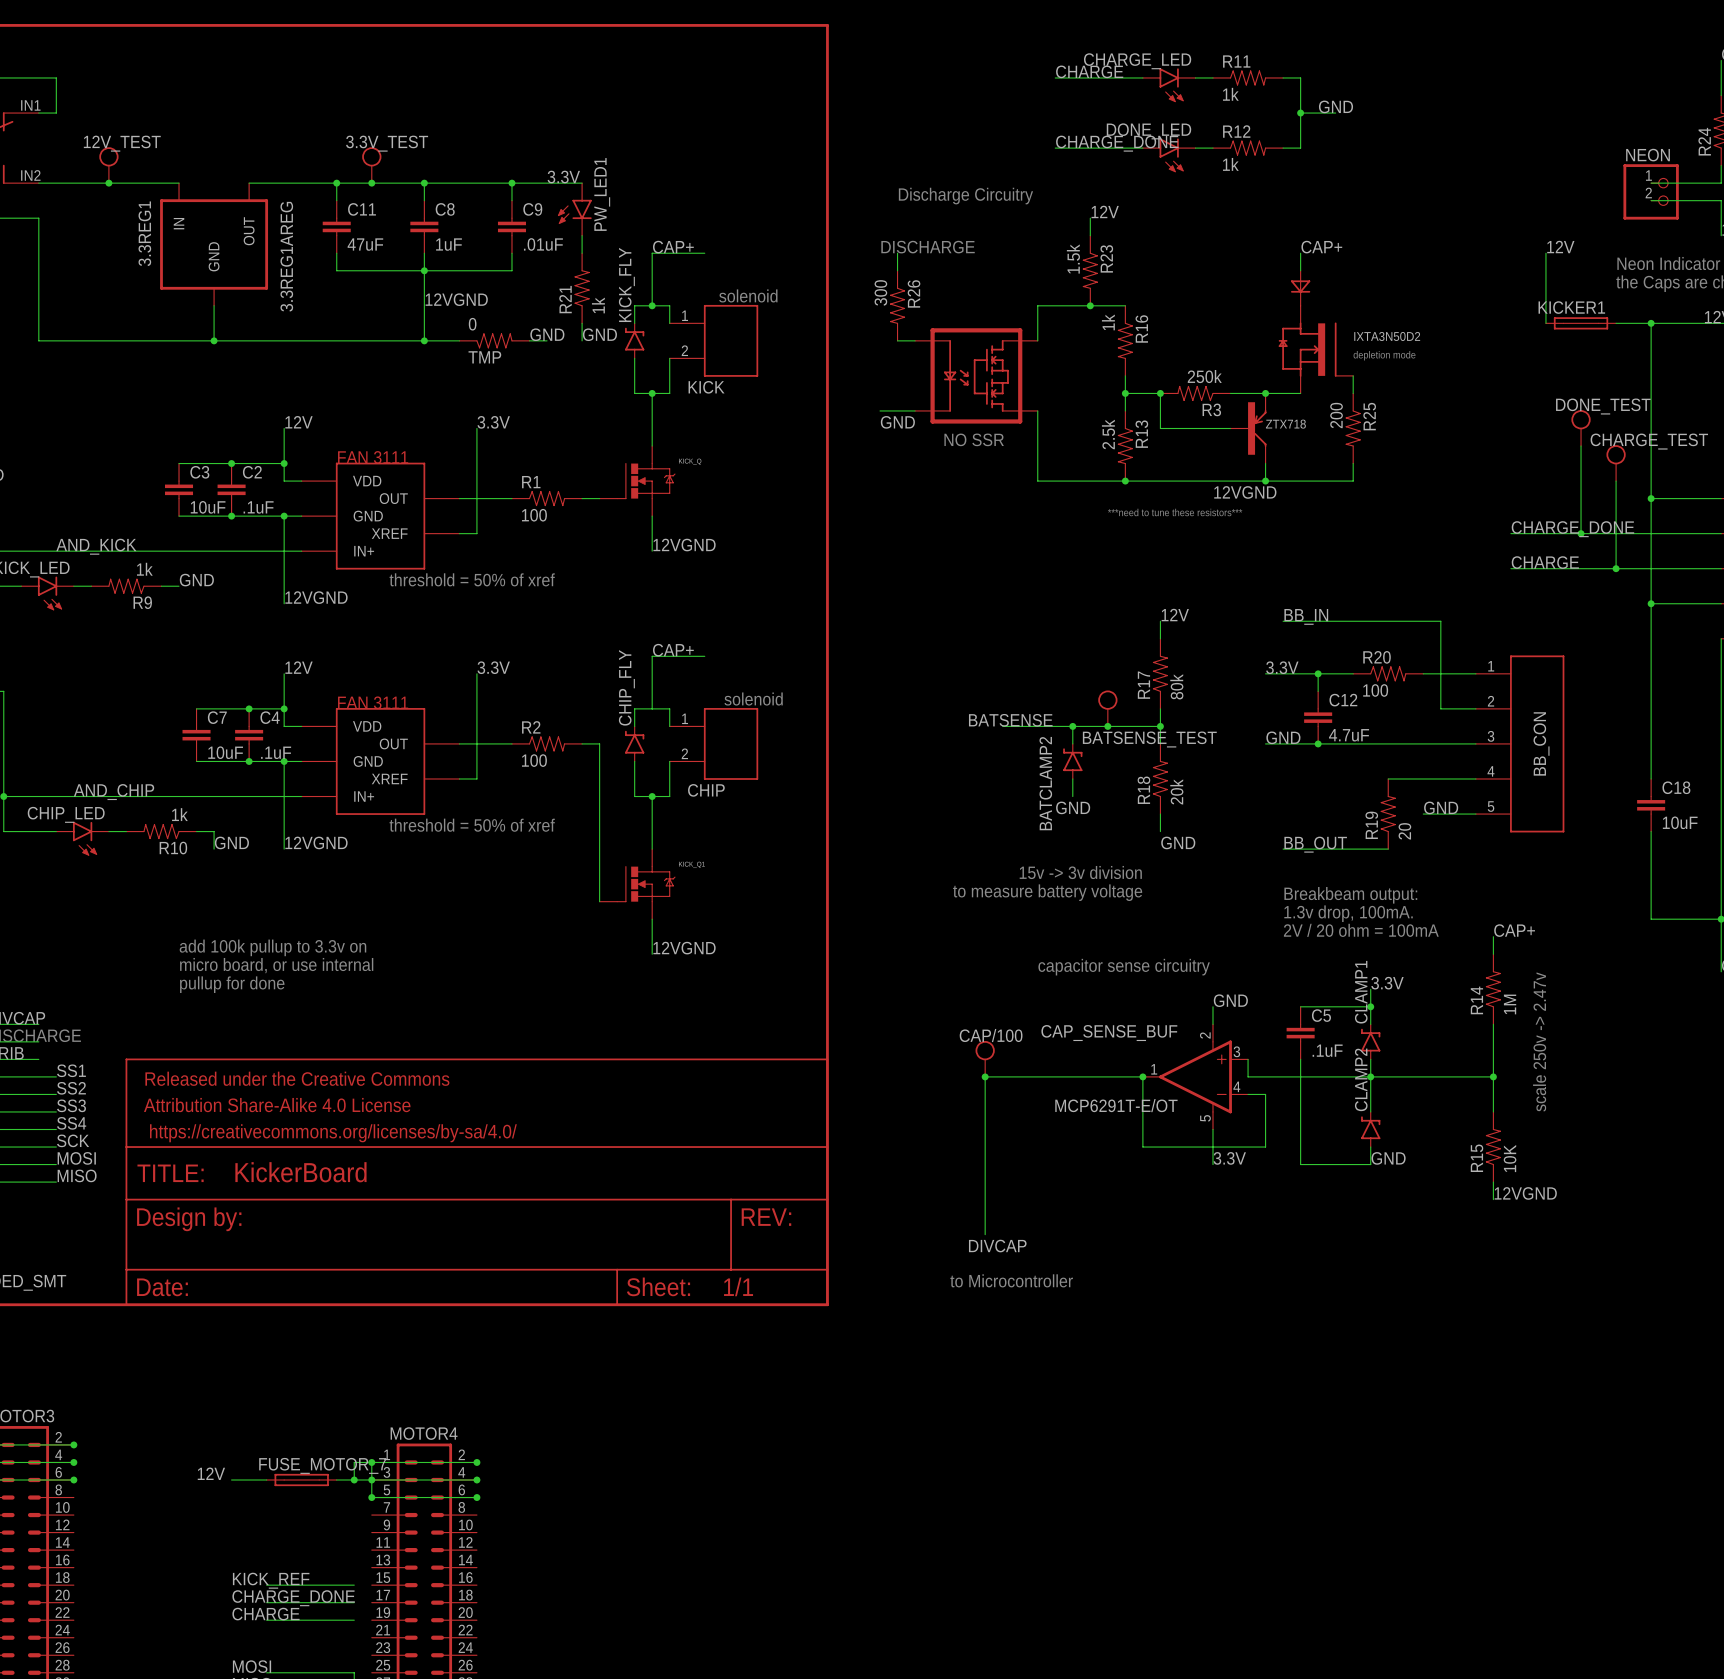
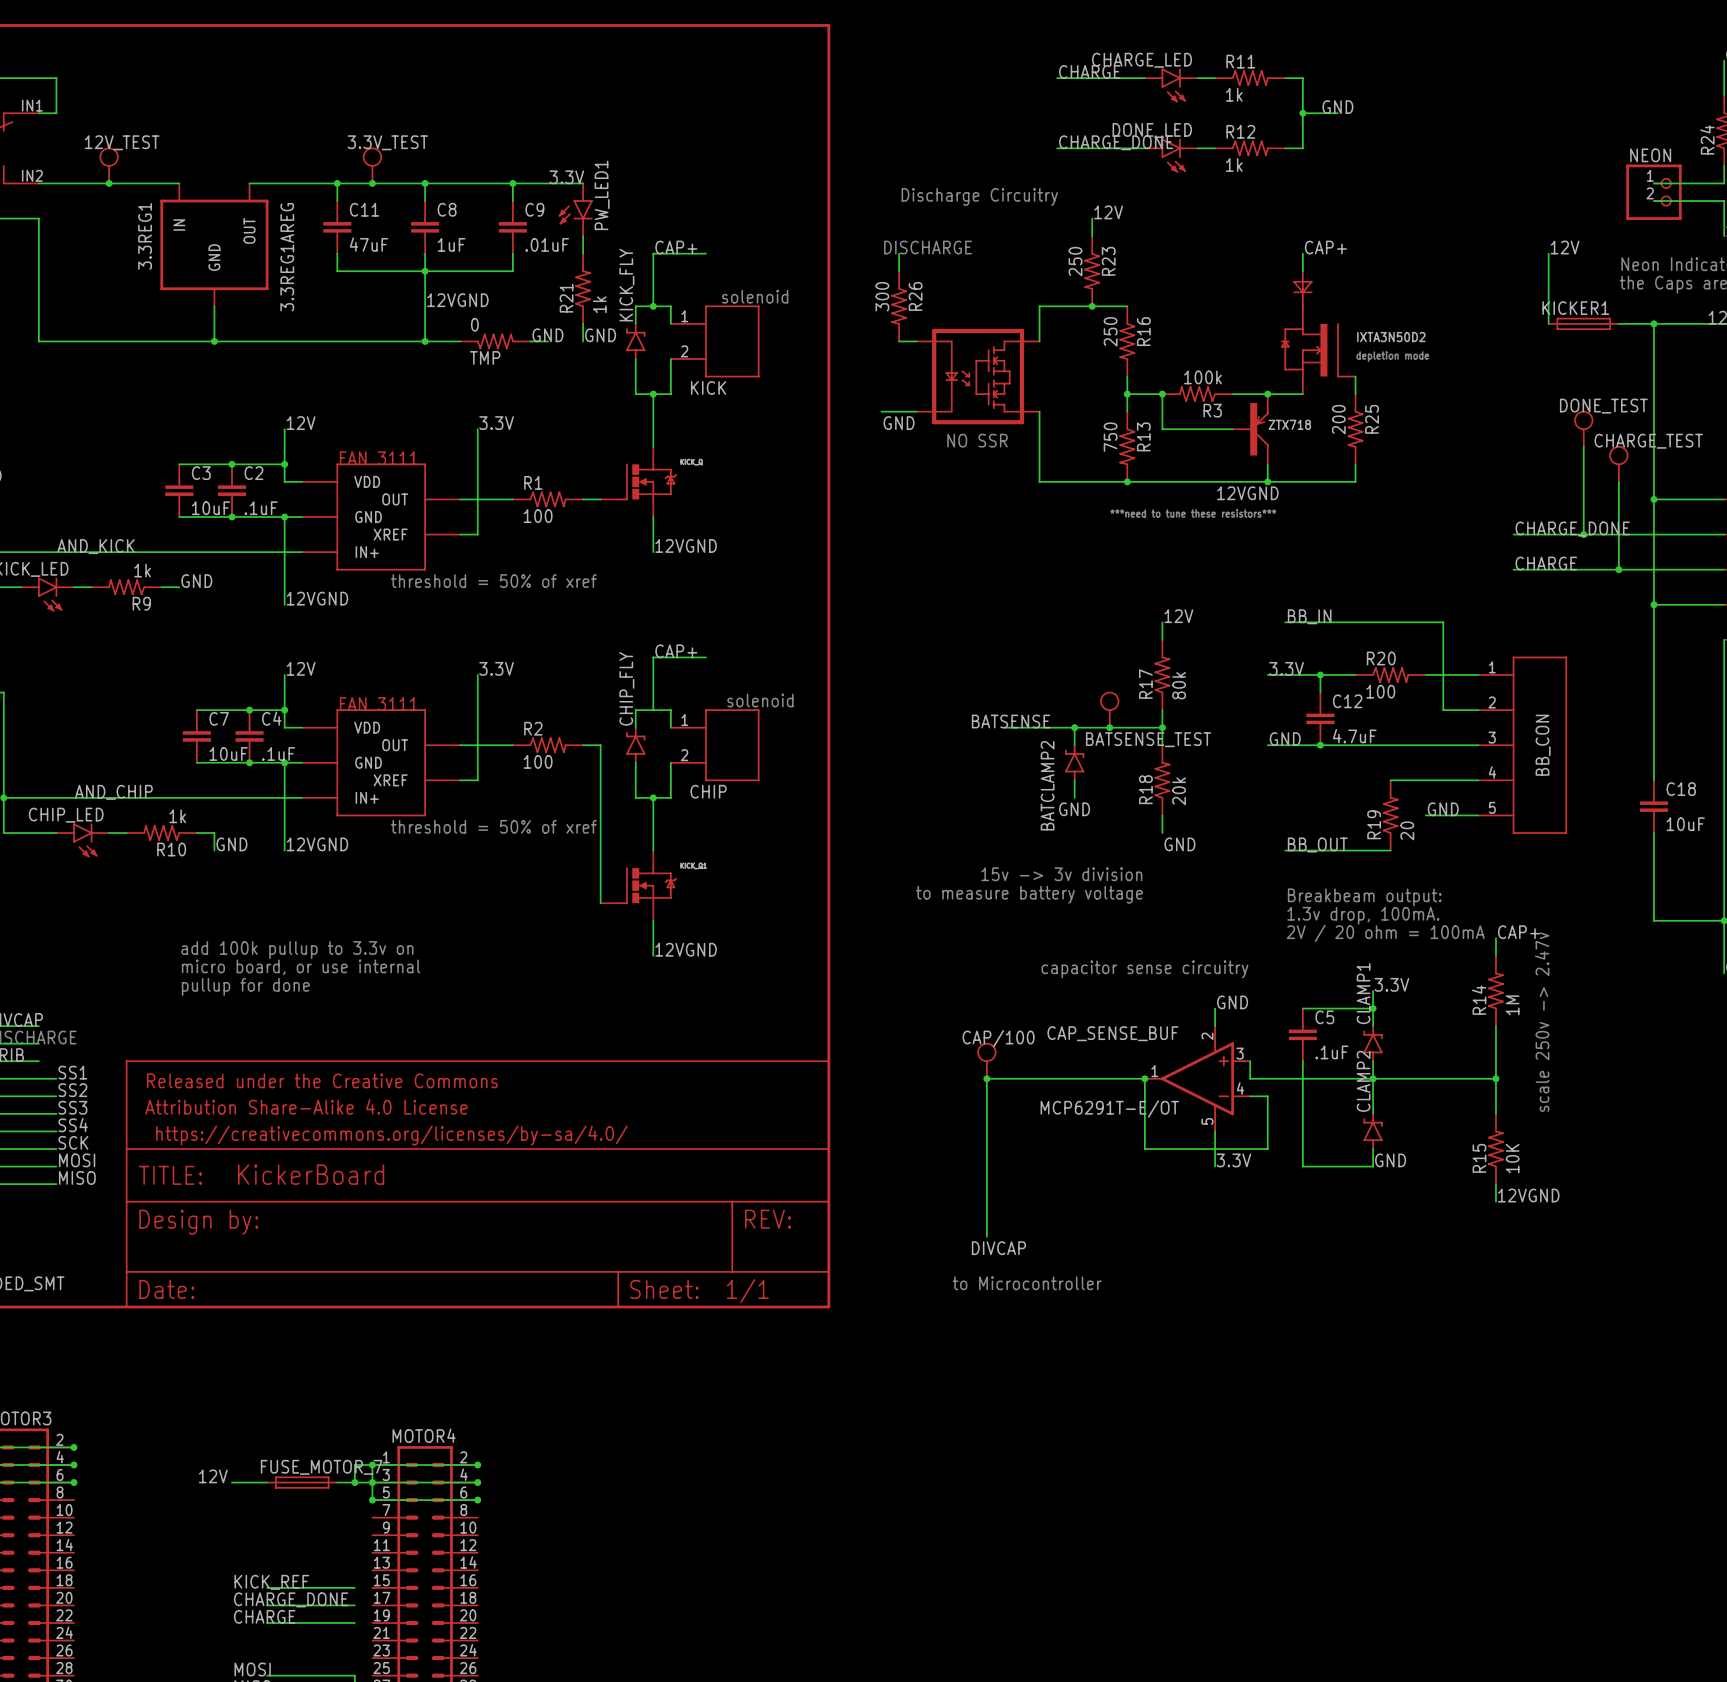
R23 value: 1.5k (1073, 259) -> 250 (1075, 261)
R16 value: 1k (1108, 322) -> 250 (1110, 331)
R3 value: 250k (1204, 376) -> 100k (1202, 377)
R13 value: 2.5k (1108, 434) -> 750 (1110, 437)

